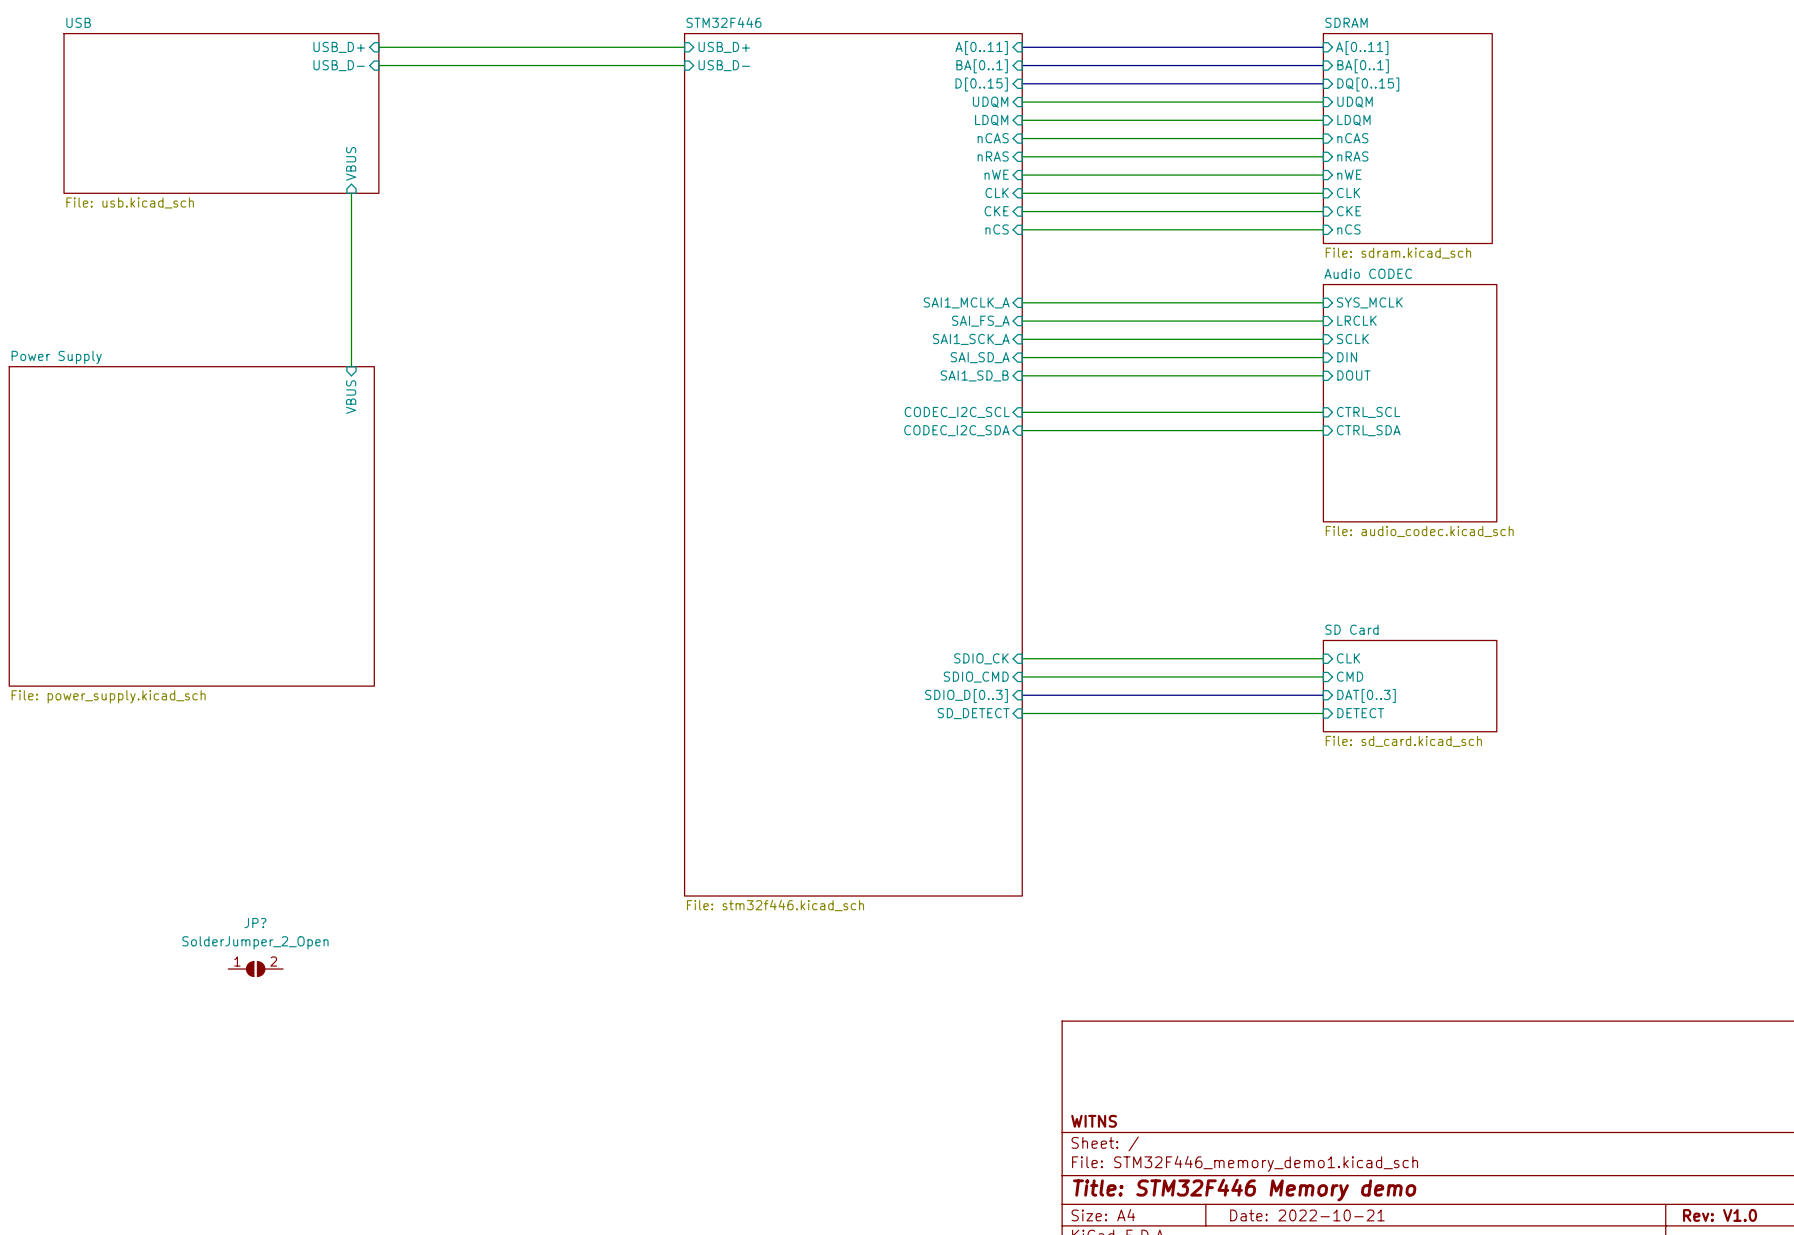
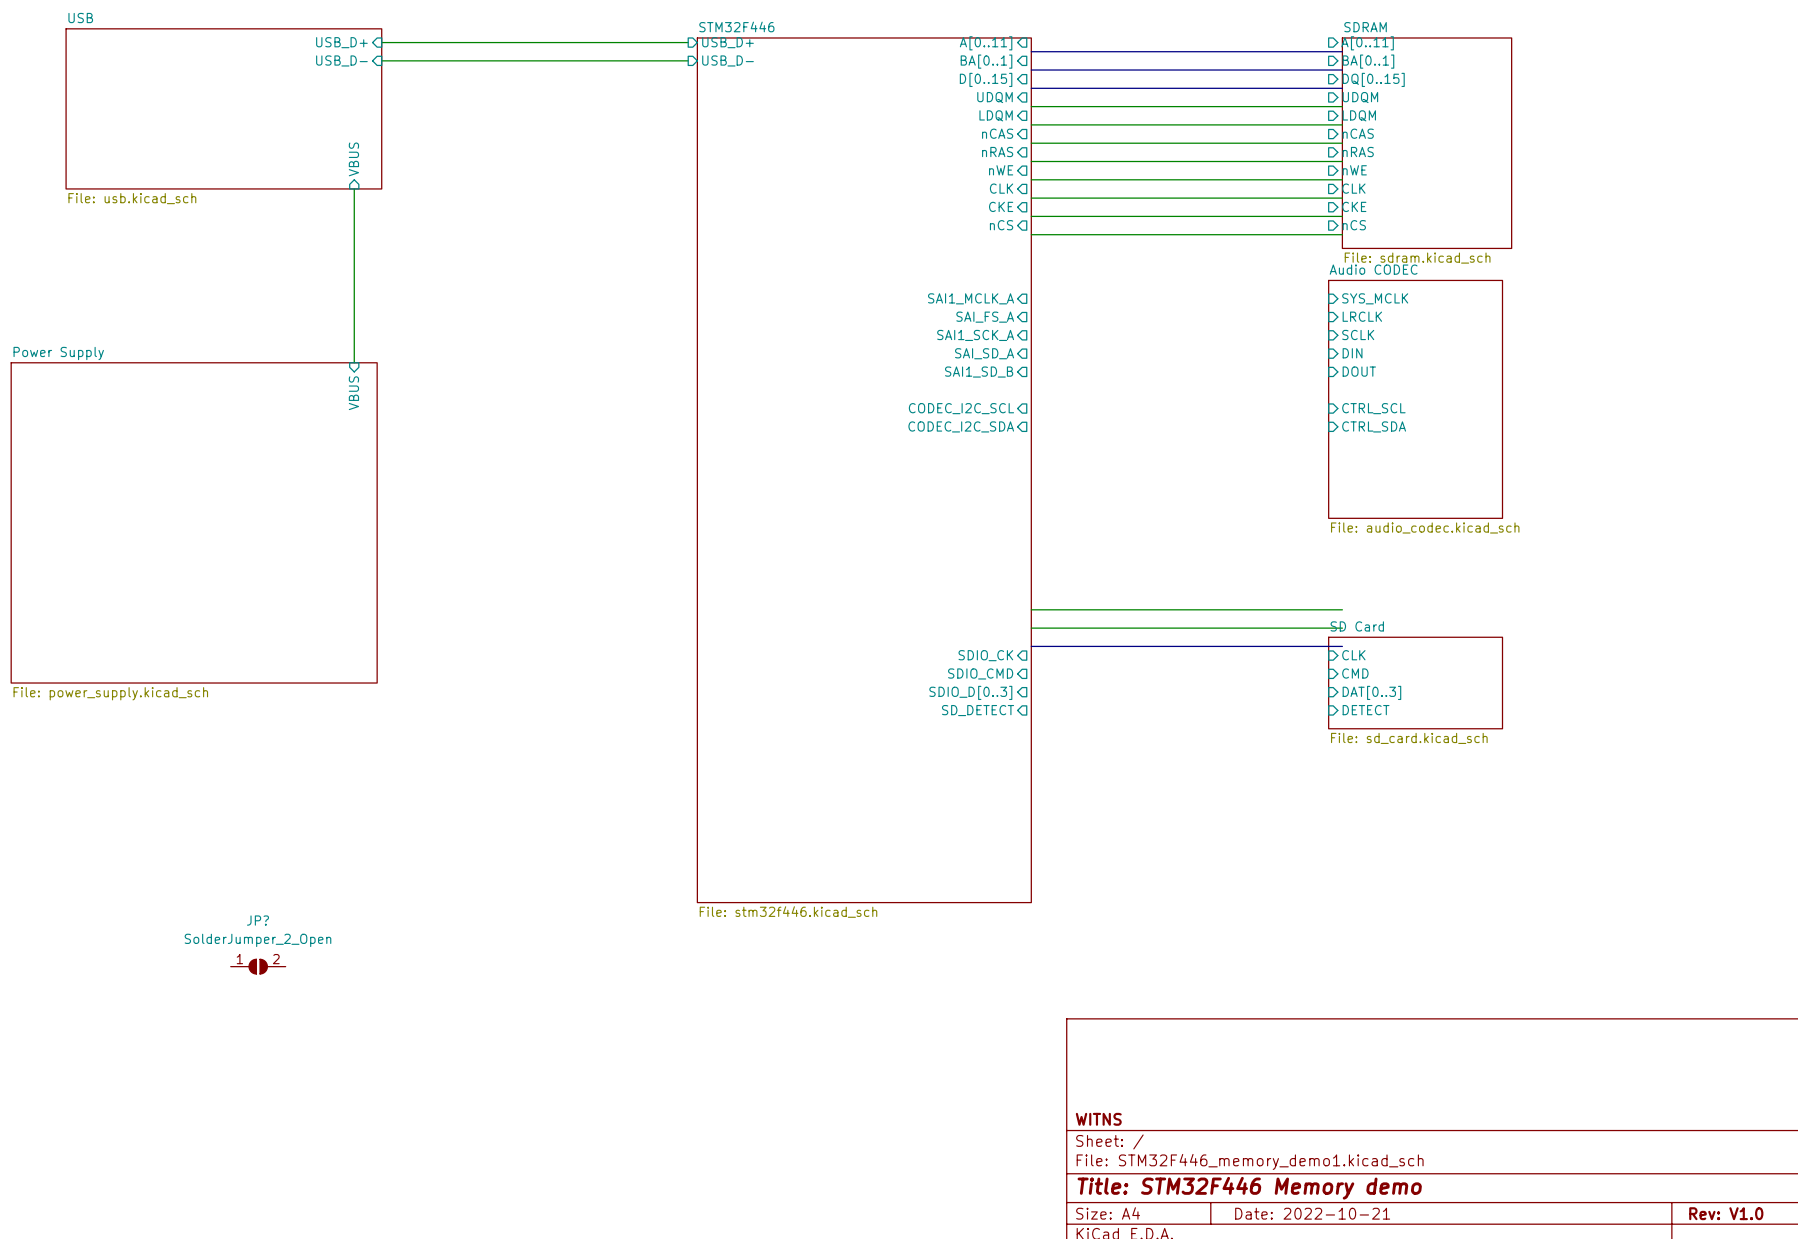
sheet STM32F446 shape: [684, 33, 1023, 897] -> [696, 37, 1032, 904]
bus: (1022, 47) (1323, 47) -> none
bus: none -> (1031, 51) (1342, 51)
bus: (1022, 65) (1323, 65) -> none
bus: none -> (1031, 70) (1342, 70)
bus: (1022, 83) (1323, 83) -> none
bus: none -> (1031, 88) (1342, 88)
wire: (1022, 102) (1323, 102) -> none
wire: none -> (1031, 106) (1342, 106)
wire: (1022, 120) (1323, 120) -> none
wire: none -> (1031, 124) (1342, 124)
wire: (1022, 138) (1323, 138) -> none
sheet SDRAM position: (1407, 138) -> (1427, 143)
wire: none -> (1031, 143) (1342, 143)
wire: (1022, 156) (1323, 156) -> none
wire: none -> (1031, 161) (1342, 161)
wire: (1022, 175) (1323, 175) -> none
wire: none -> (1031, 179) (1342, 179)
wire: (1022, 193) (1323, 193) -> none
wire: none -> (1031, 198) (1342, 198)
wire: (1022, 211) (1323, 211) -> none
wire: none -> (1031, 216) (1342, 216)
wire: (1022, 229) (1323, 229) -> none
wire: none -> (1031, 234) (1342, 234)
wire: (1022, 302) (1323, 302) -> none
wire: (1022, 321) (1323, 321) -> none
wire: (1022, 339) (1323, 339) -> none
wire: (1022, 357) (1323, 357) -> none
wire: (1022, 375) (1323, 375) -> none
wire: (1022, 412) (1323, 412) -> none
wire: (1022, 430) (1323, 430) -> none
wire: none -> (1031, 609) (1342, 609)
wire: none -> (1031, 628) (1342, 628)
bus: none -> (1031, 646) (1342, 646)
wire: (1022, 658) (1323, 658) -> none
wire: (1022, 676) (1323, 676) -> none
bus: (1022, 695) (1323, 695) -> none
wire: (1022, 713) (1323, 713) -> none

